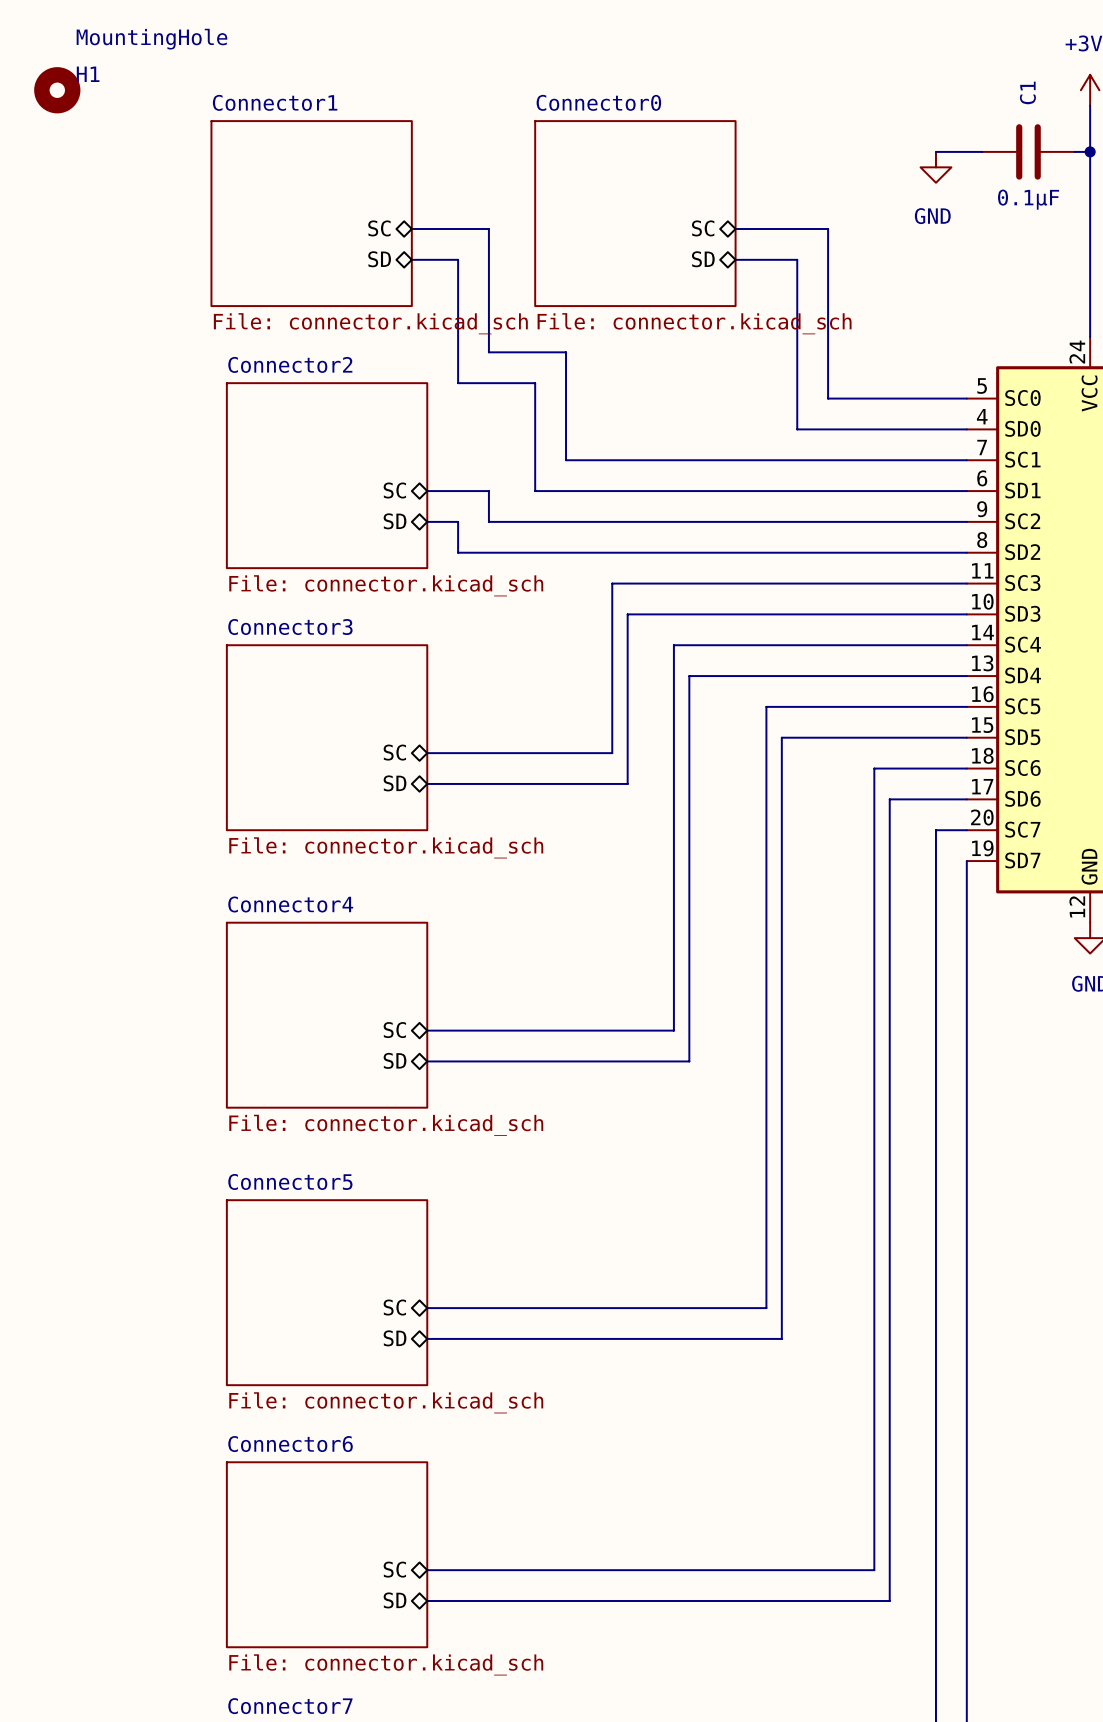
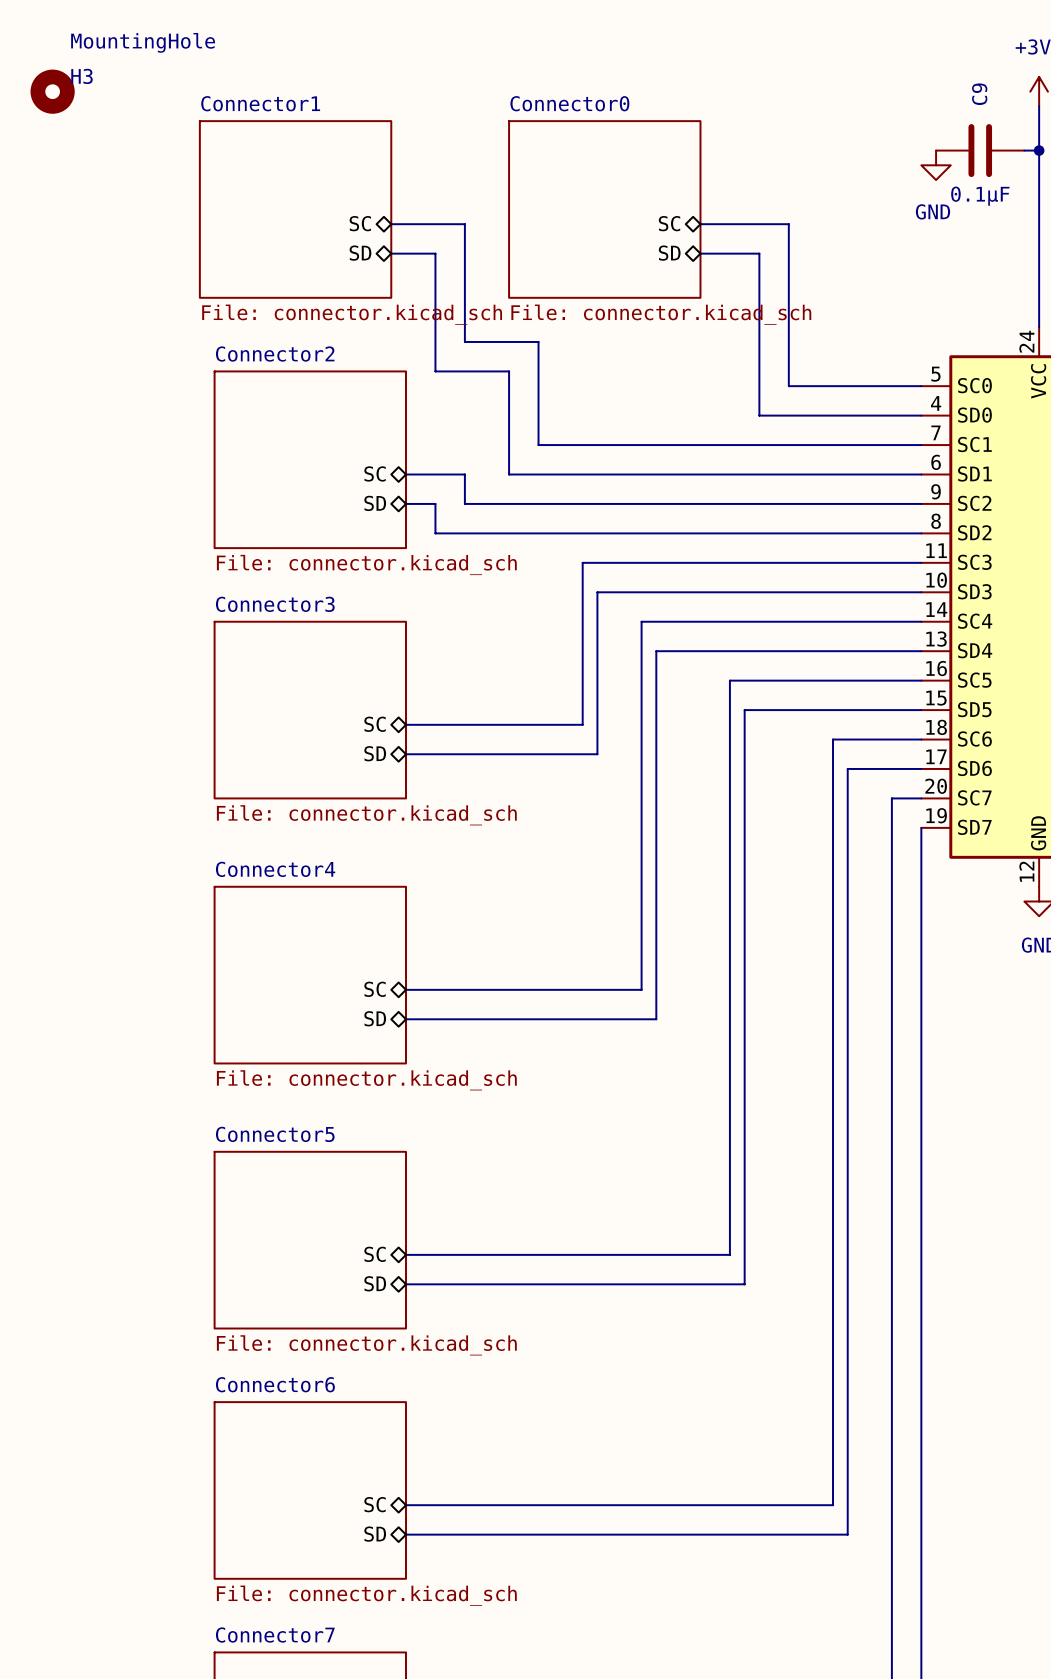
H1 name: H1 (88, 74) -> H3 (81, 76)
C1 name: C1 (1027, 92) -> C9 (979, 94)
wire: (935, 151) (982, 151) -> none
power symbol position: GND (935, 167) -> GND (936, 165)

